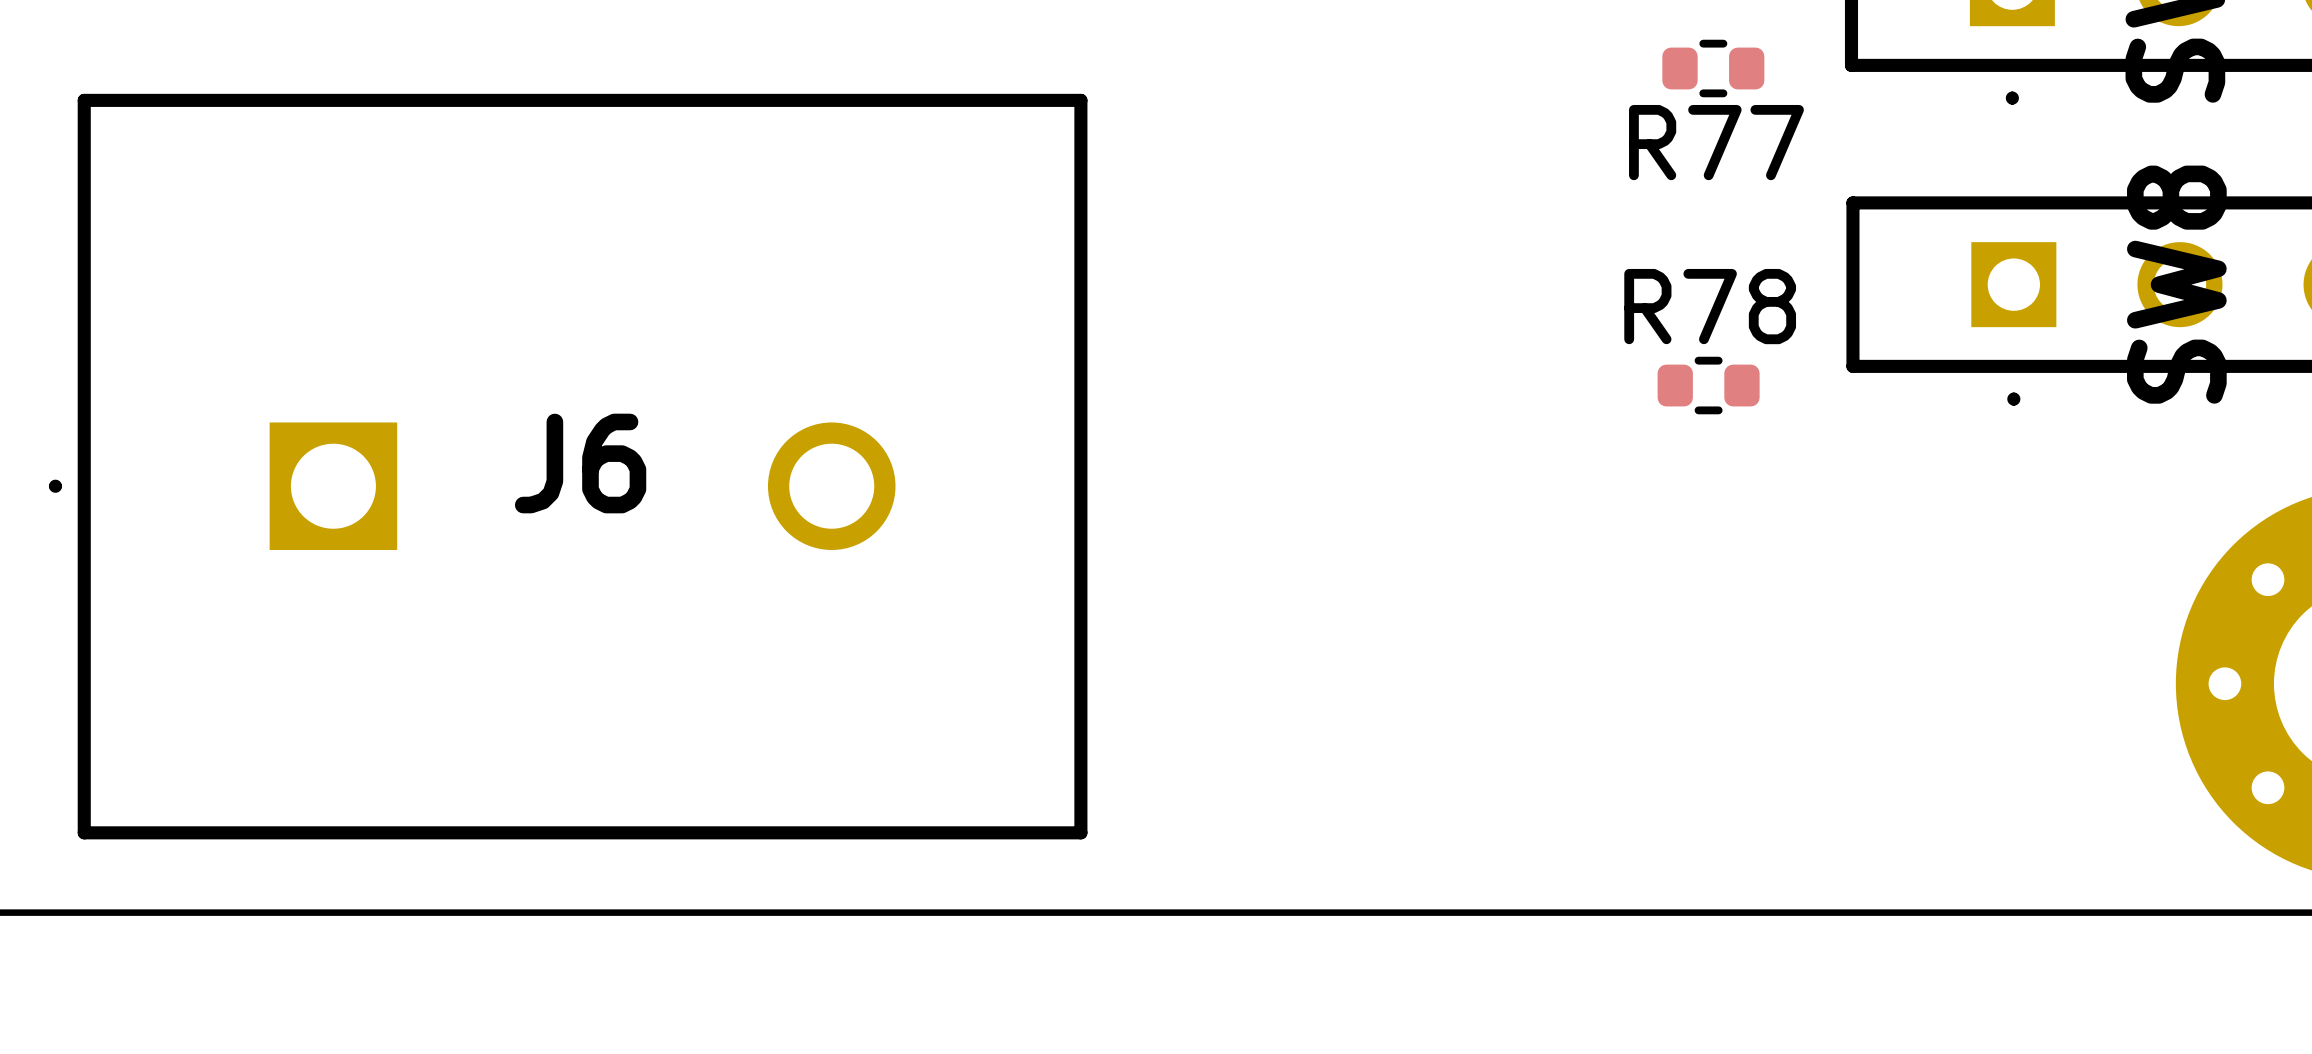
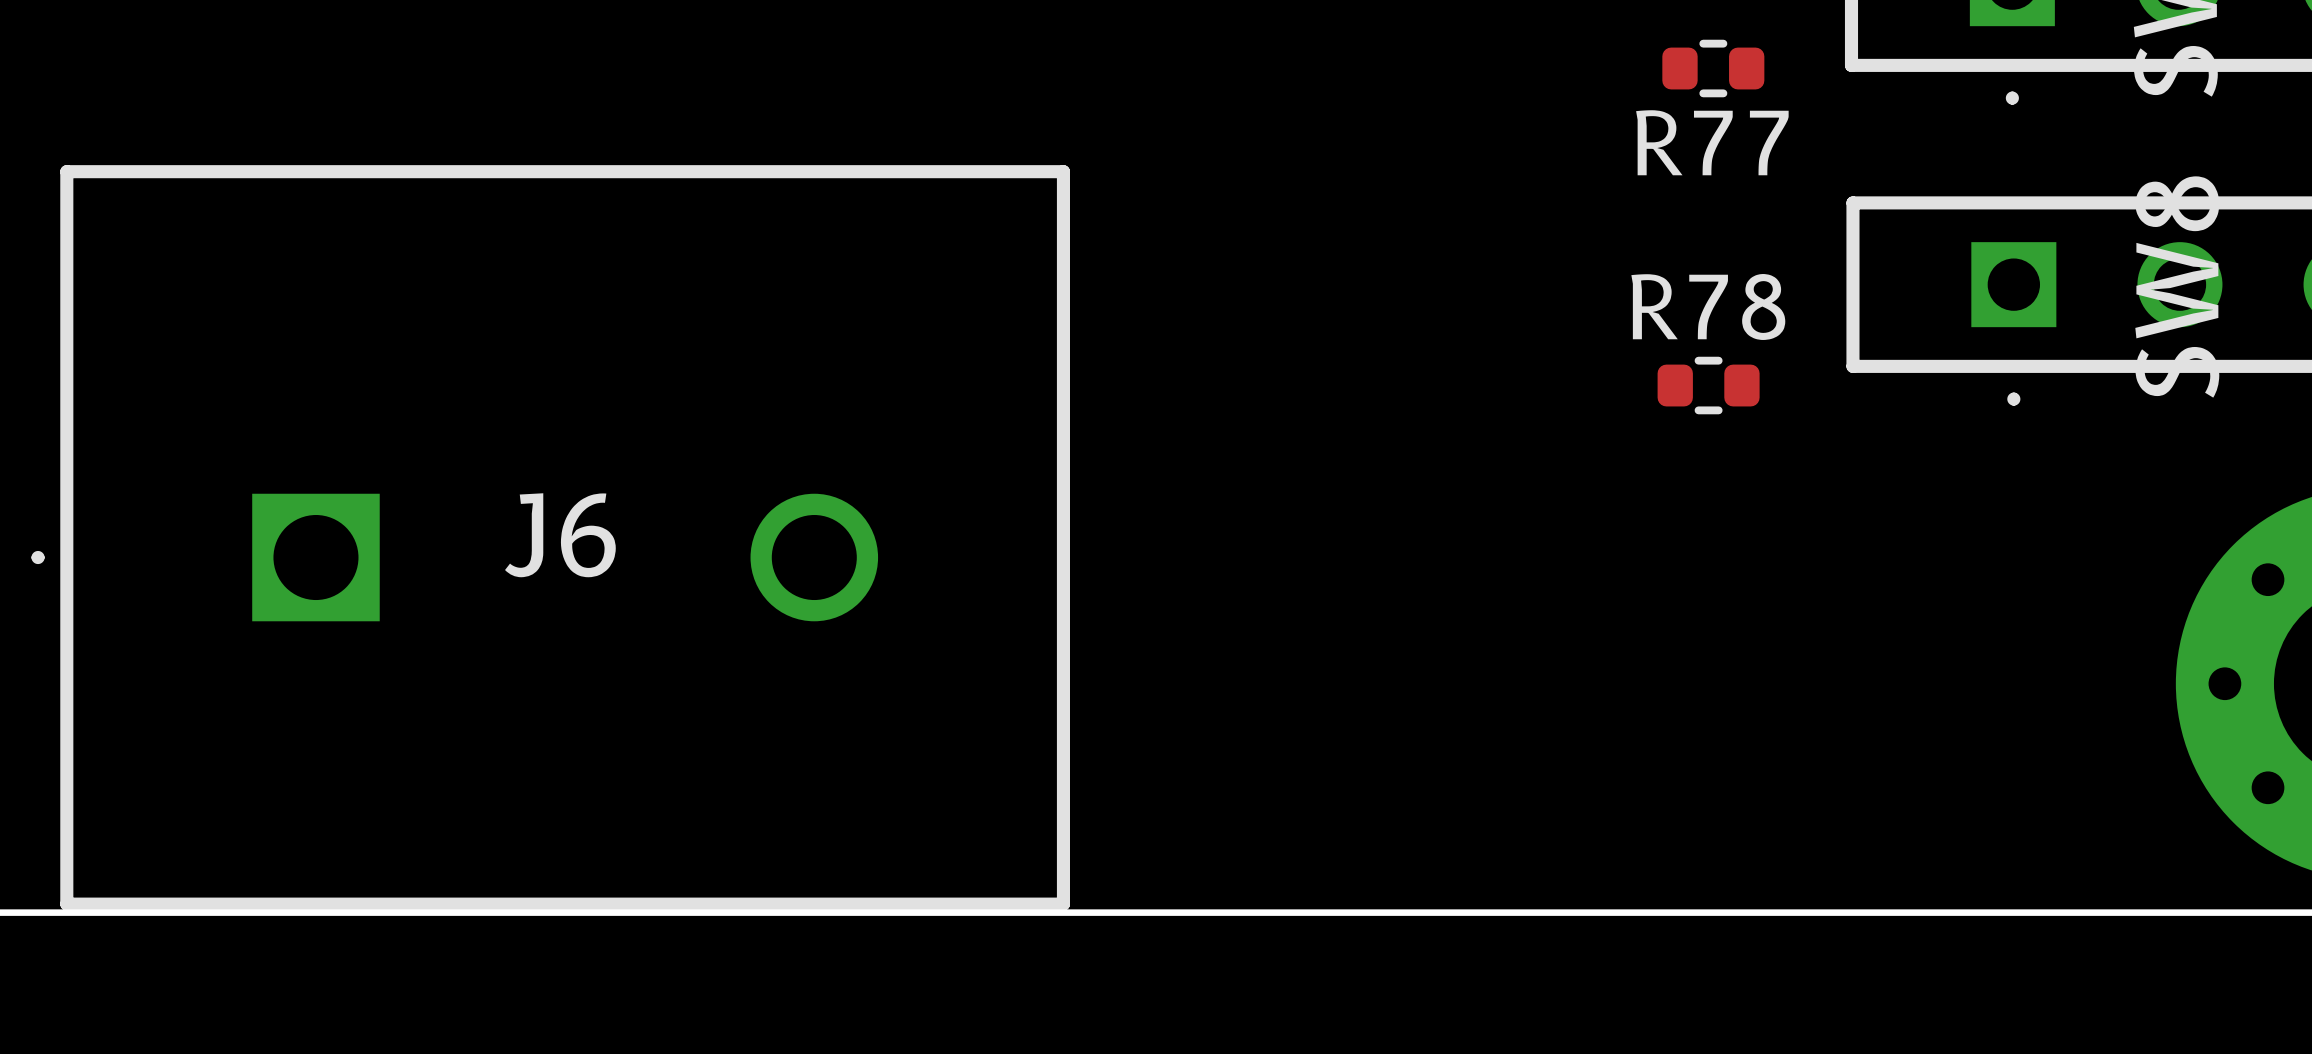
J6 position: (568, 466) -> (550, 537)

